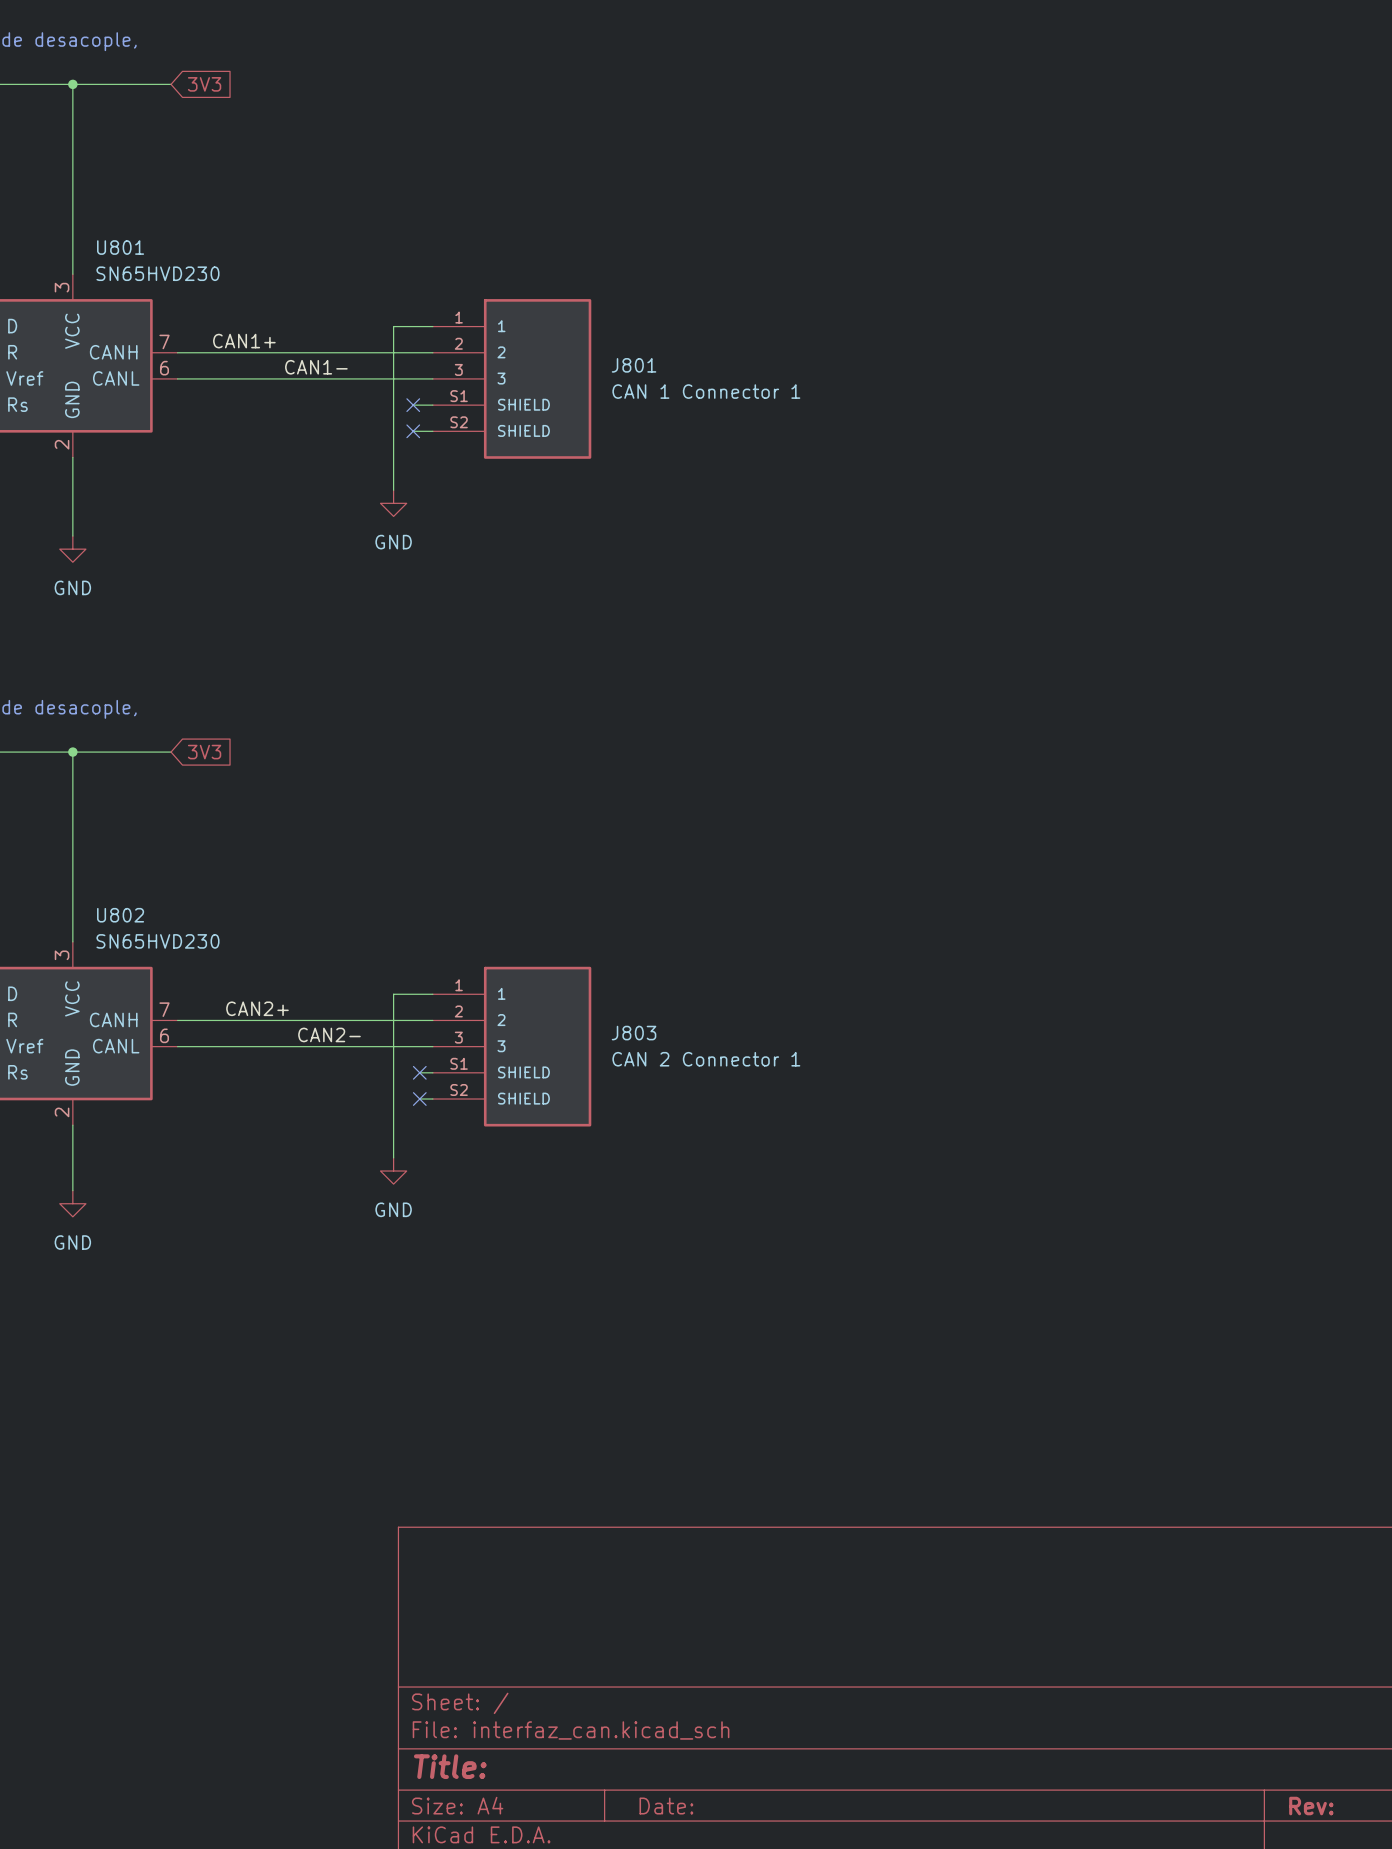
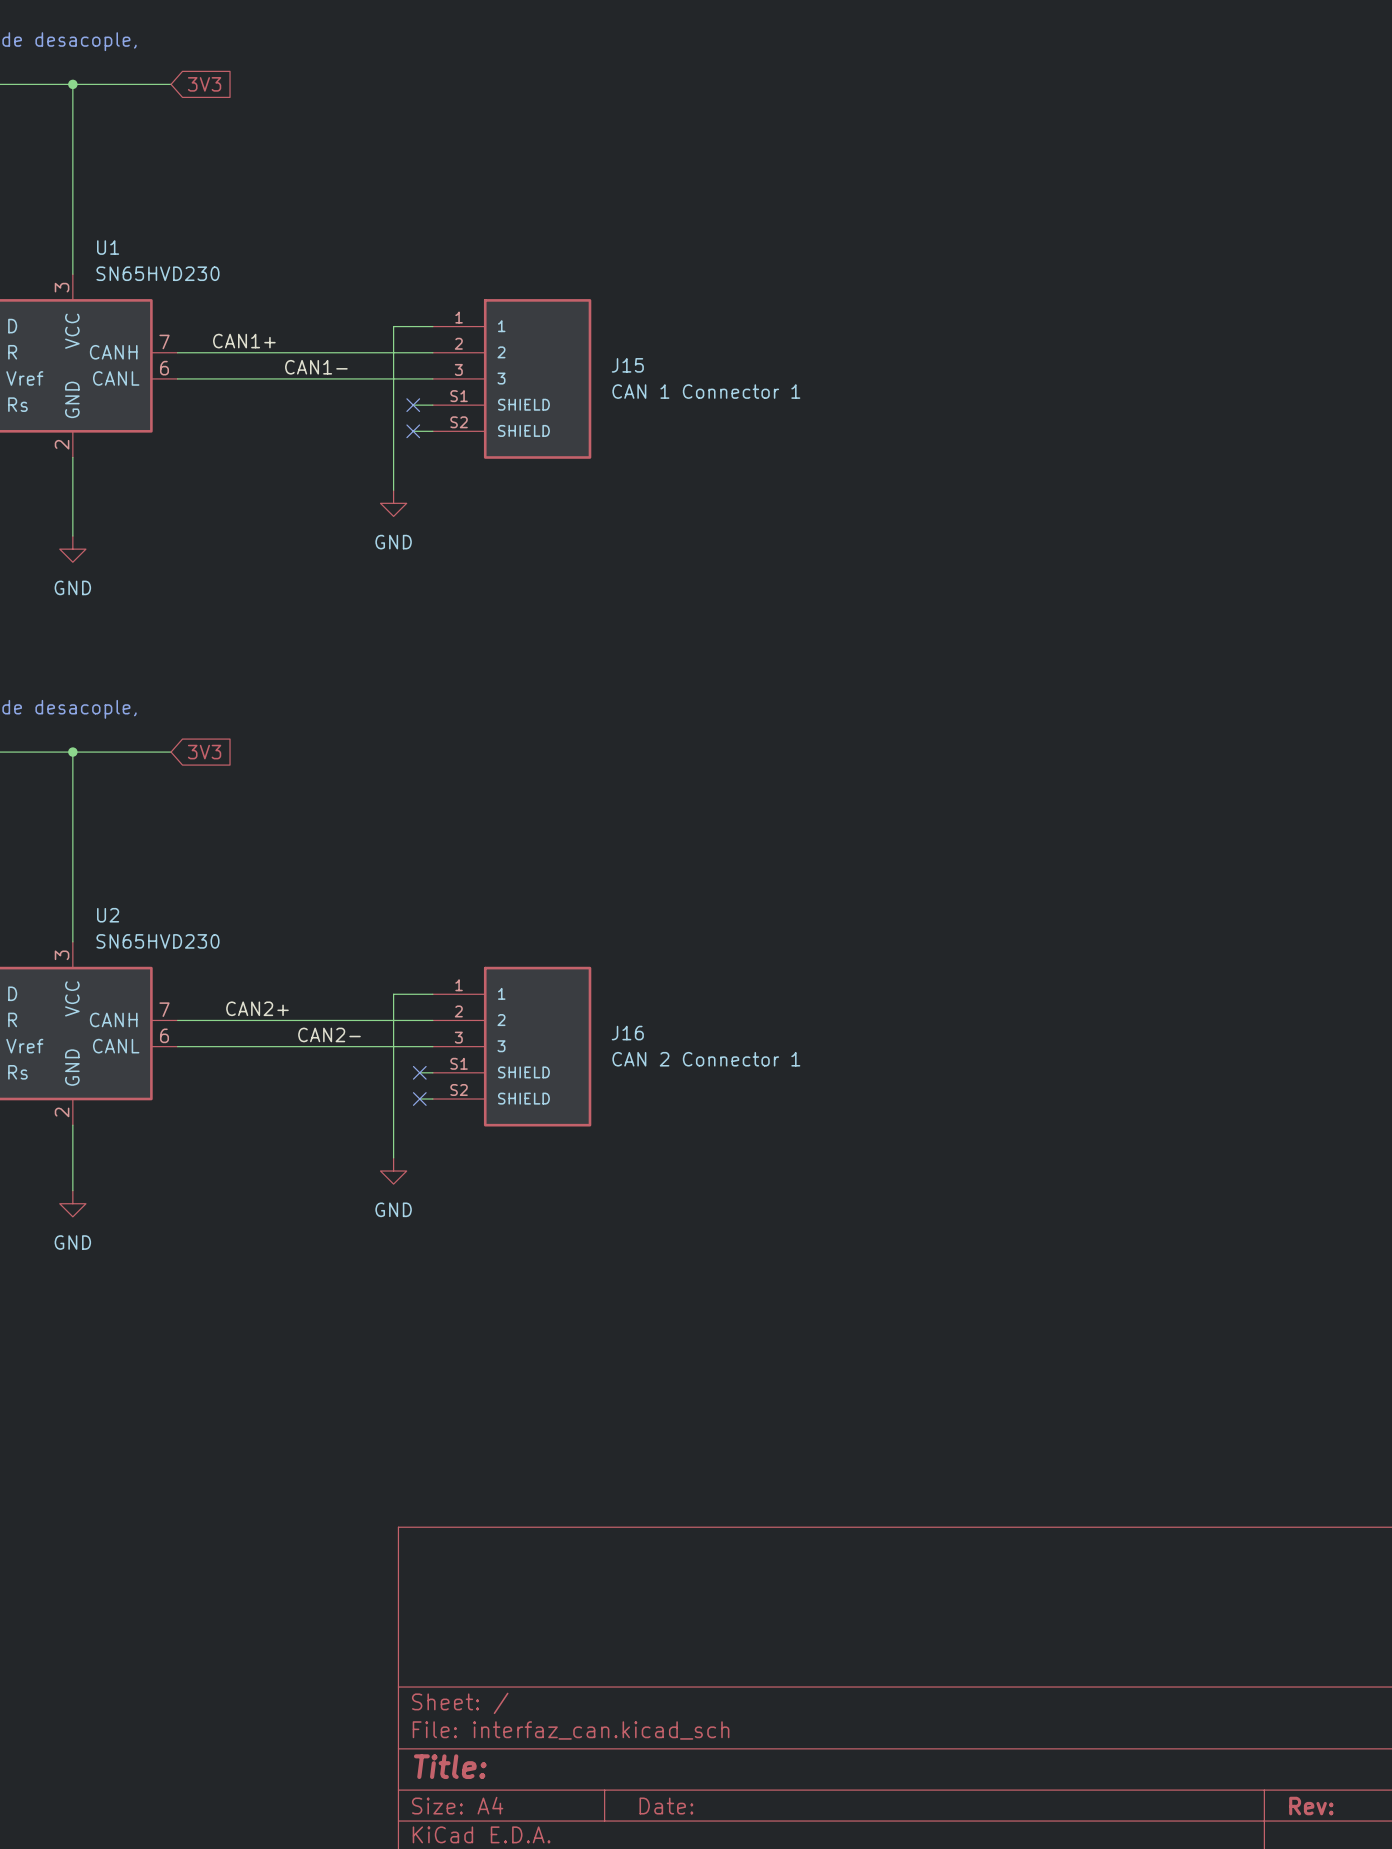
U801 name: U801 (120, 247) -> U1 (108, 247)
J801 name: J801 (634, 365) -> J15 (627, 365)
U802 name: U802 (120, 915) -> U2 (108, 915)
J803 name: J803 (634, 1033) -> J16 (627, 1033)

